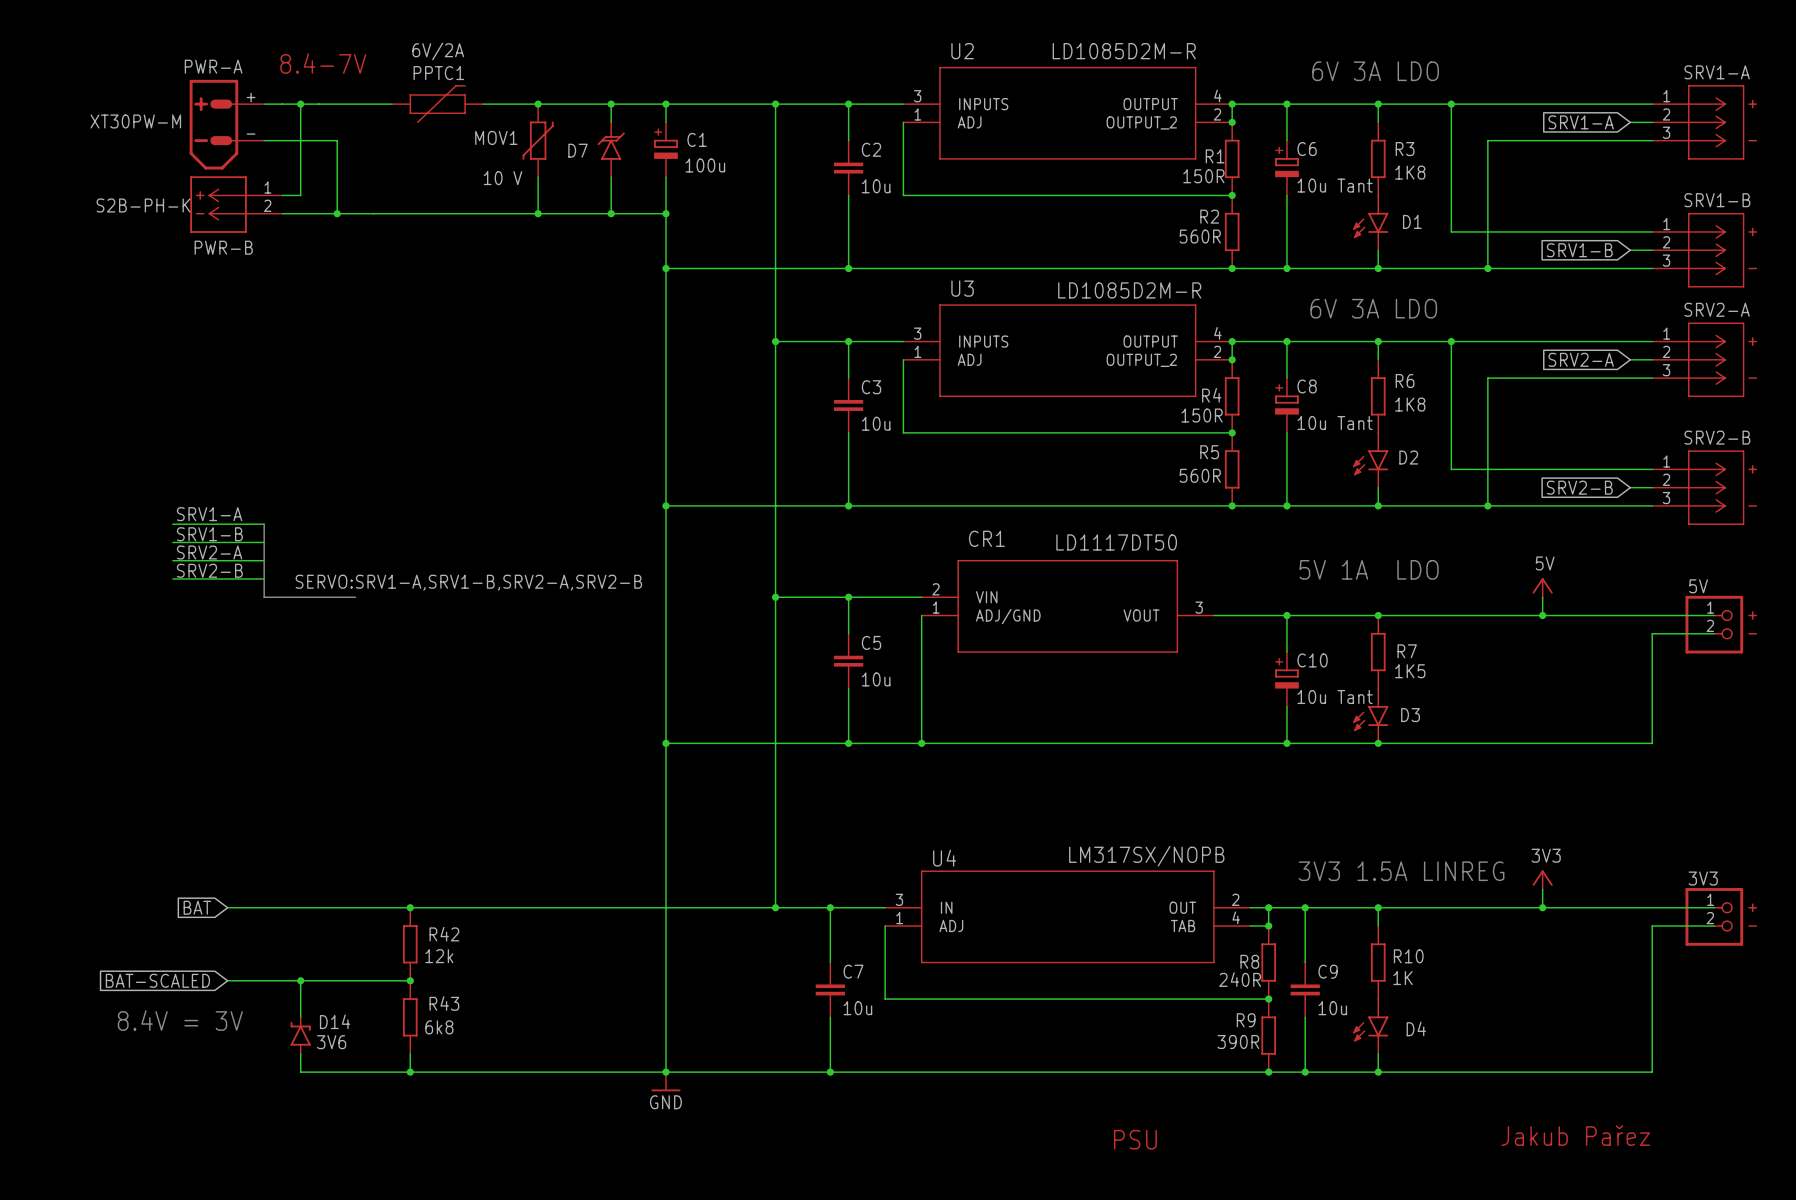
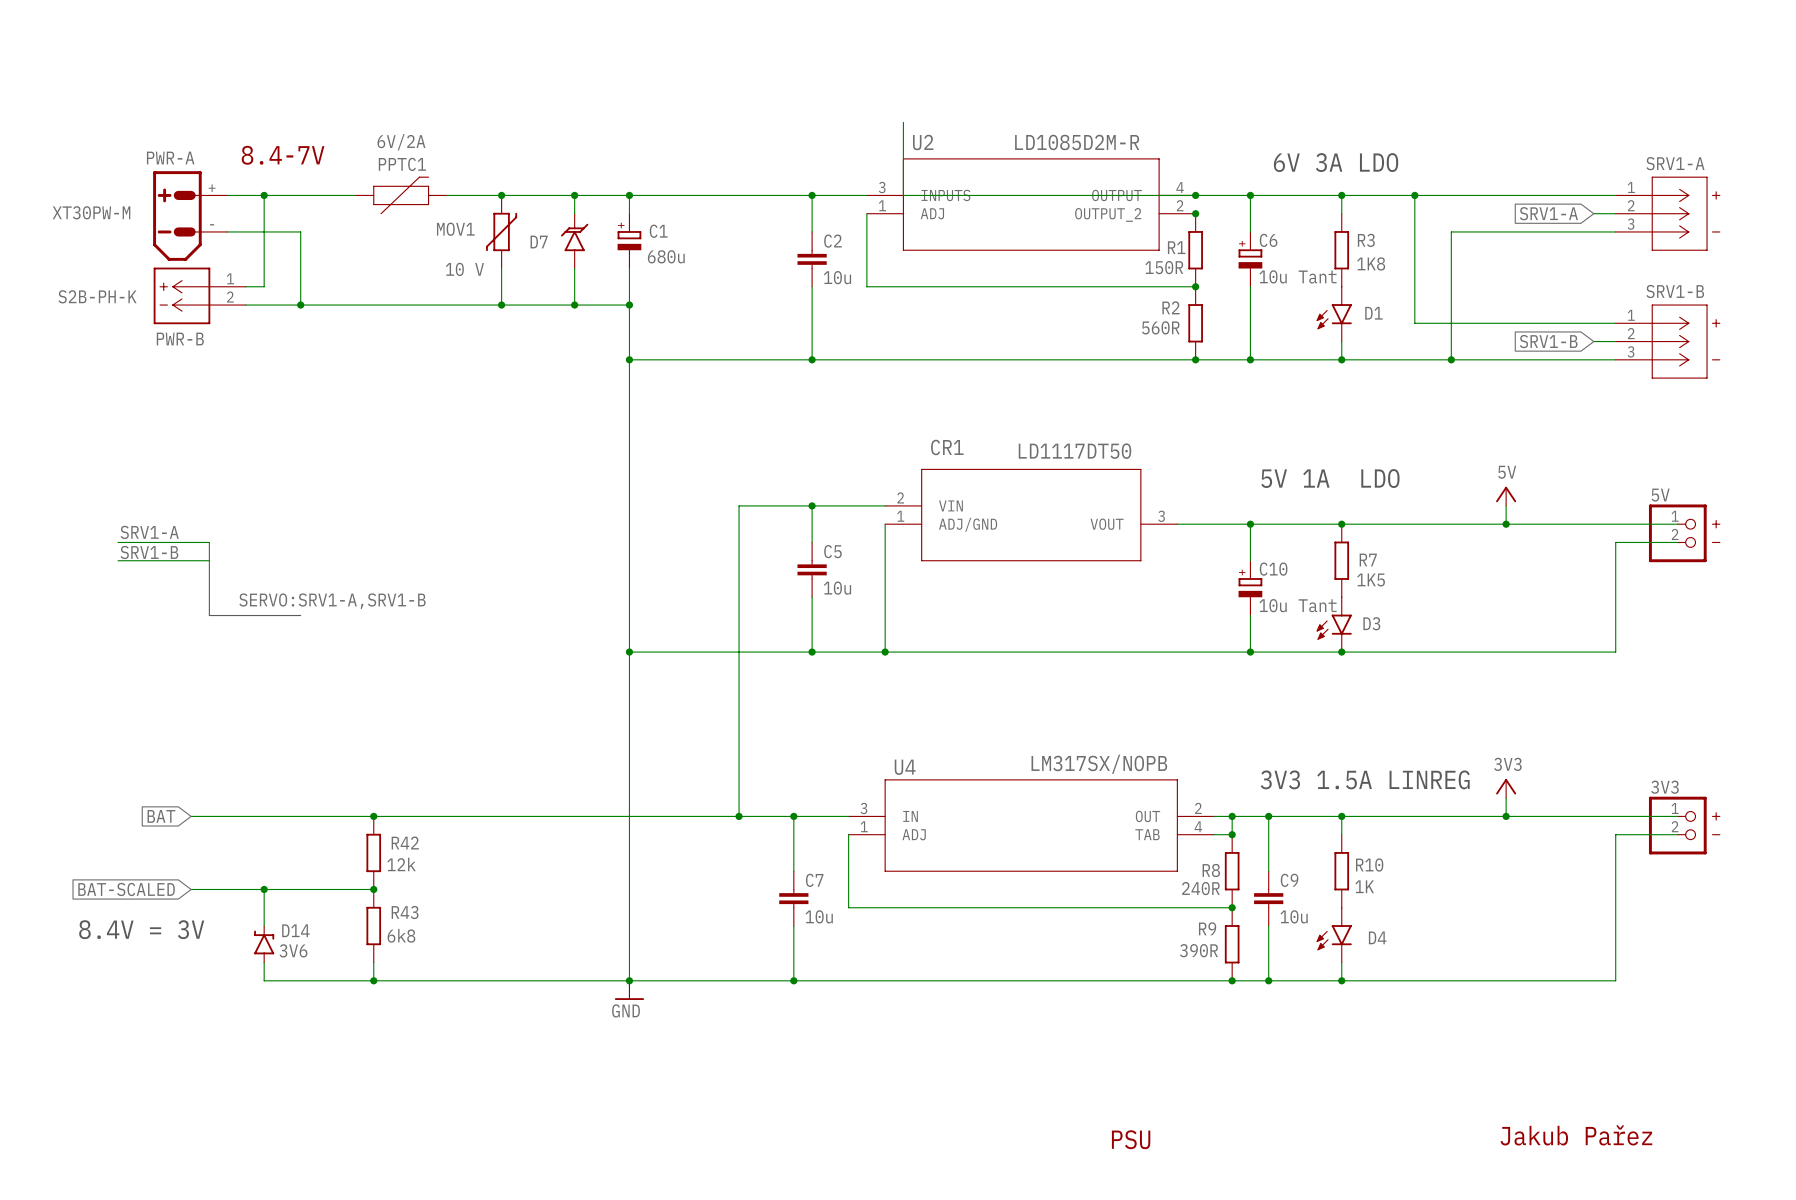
text position: 8.4-7V (323, 63) -> 8.4-7V (283, 155)
text: 6V 3A LDO (1375, 71) -> none
line: (1752, 100) (1752, 107) -> (1716, 191) (1716, 199)
wire: (264, 104) (392, 104) -> none
wire: (300, 104) (300, 195) -> (355, 195) (300, 195)
junction: (300, 104) -> none
PPTC1 position: (437, 104) -> (401, 195)
wire: (483, 104) (903, 104) -> (446, 195) (866, 195)
junction: (538, 104) -> none
wire: (611, 104) (611, 122) -> (574, 195) (574, 213)
junction: (611, 104) -> none
wire: (665, 104) (665, 122) -> (629, 195) (629, 213)
junction: (665, 104) -> none
wire: (775, 104) (775, 907) -> none
junction: (775, 104) -> none
wire: (848, 104) (848, 140) -> (812, 195) (812, 231)
junction: (848, 104) -> none
junction: (1232, 104) -> none
wire: (1286, 104) (1286, 140) -> (1250, 195) (1250, 231)
junction: (1286, 104) -> none
wire: (1378, 104) (1378, 122) -> (1341, 195) (1341, 213)
junction: (1378, 104) -> none
wire: (1451, 104) (1451, 231) -> (1451, 341) (1451, 231)
junction: (1451, 104) -> none
wire: (1652, 104) (1232, 104) (1232, 122) -> none
line: (1749, 104) (1756, 104) -> (1712, 195) (1719, 195)
U2 position: (1067, 113) -> (1031, 204)
junction: (1232, 122) -> none
global label position: SRV1-A (1581, 122) -> SRV1-A (1548, 213)
wire: (1630, 122) (1652, 122) -> (1593, 213) (1615, 213)
SRV1-A position: (1698, 122) -> (1661, 213)
PWR-A position: (226, 124) -> (190, 215)
wire: (264, 140) (337, 140) (337, 213) -> (227, 231) (300, 231) (300, 305)
MOV1 position: (538, 140) -> (501, 231)
wire: (1652, 140) (1487, 140) (1487, 268) -> none
line: (1749, 140) (1756, 140) -> (1712, 231) (1719, 231)
D7 position: (611, 149) -> (574, 241)
C1 position: (665, 149) -> (629, 241)
R1 position: (1232, 158) -> (1195, 250)
R3 position: (1378, 158) -> (1341, 250)
text: none -> 6V 3A LDO (1336, 162)
C1 value: 100u (705, 165) -> 680u (666, 256)
C2 position: (848, 168) -> (812, 259)
C6 position: (1286, 168) -> (1250, 259)
wire: (538, 177) (538, 213) -> (501, 268) (501, 305)
wire: (611, 177) (611, 213) -> (574, 268) (574, 305)
wire: (665, 177) (665, 1072) -> none
wire: none -> (264, 195) (264, 286) (245, 286)
junction: none -> (264, 195)
junction: none -> (501, 195)
junction: none -> (574, 195)
junction: none -> (629, 195)
junction: none -> (812, 195)
wire: (848, 195) (848, 268) -> (812, 286) (812, 359)
junction: none -> (1195, 195)
wire: none -> (1232, 195) (1615, 195)
junction: (1232, 195) -> none
junction: none -> (1250, 195)
wire: (1286, 195) (1286, 268) -> (1250, 286) (1250, 359)
junction: none -> (1341, 195)
wire: none -> (1414, 195) (1414, 323) (1615, 323)
junction: none -> (1414, 195)
PWR-B position: (236, 204) -> (199, 295)
text position: S2B-PH-K (143, 205) -> S2B-PH-K (97, 296)
line: (196, 213) (203, 213) -> (160, 305) (167, 305)
wire: (282, 213) (665, 213) -> (245, 305) (629, 305)
junction: (337, 213) -> none
junction: (538, 213) -> none
junction: (611, 213) -> none
junction: (665, 213) -> none
junction: none -> (1195, 213)
D1 position: (1370, 222) -> (1334, 314)
line: (1752, 228) (1752, 235) -> (1716, 319) (1716, 326)
R2 position: (1232, 231) -> (1195, 323)
line: (1749, 231) (1756, 231) -> (1712, 323) (1719, 323)
wire: (1378, 250) (1378, 268) -> (1341, 341) (1341, 359)
global label position: SRV1-B (1579, 250) -> SRV1-B (1548, 341)
wire: (1630, 250) (1652, 250) -> none
SRV1-B position: (1698, 250) -> (1661, 341)
wire: none -> (629, 268) (629, 980)
wire: (665, 268) (1652, 268) -> (629, 359) (1615, 359)
junction: (665, 268) -> none
junction: (848, 268) -> none
junction: (1232, 268) -> none
junction: (1286, 268) -> none
junction: (1378, 268) -> none
junction: (1487, 268) -> none
line: (1749, 268) (1756, 268) -> (1712, 359) (1719, 359)
junction: none -> (1195, 286)
junction: none -> (300, 305)
junction: none -> (501, 305)
junction: none -> (574, 305)
junction: none -> (629, 305)
text: 6V 3A LDO (1373, 308) -> none
line: (1752, 337) (1752, 345) -> none
wire: (775, 341) (903, 341) -> none
junction: (775, 341) -> none
wire: (848, 341) (848, 378) -> none
junction: (848, 341) -> none
junction: (1232, 341) -> none
wire: (1286, 341) (1286, 378) -> none
junction: (1286, 341) -> none
wire: (1378, 341) (1378, 359) -> none
junction: (1378, 341) -> none
junction position: (1451, 341) -> (1451, 359)
wire: (1593, 341) (1232, 341) (1232, 359) -> none
line: (1749, 341) (1756, 341) -> none
U3: LD1085D2M-R (1067, 350) -> none
junction: none -> (629, 359)
junction: none -> (812, 359)
wire: (903, 359) (903, 432) (1232, 432) -> (866, 213) (866, 286) (1195, 286)
junction: none -> (1195, 359)
junction: (1232, 359) -> none
junction: none -> (1250, 359)
junction: none -> (1341, 359)
wire: (1451, 359) (1451, 469) (1652, 469) -> none
global label: SRV2-A (1581, 359) -> none
SRV2-A: (1698, 359) -> none
wire: (1652, 378) (1487, 378) (1487, 505) -> none
line: (1749, 378) (1756, 378) -> none
R4: 150R (1232, 396) -> none
R6: 1K8 (1378, 396) -> none
C3: 10u (848, 405) -> none
C8: 10u Tant (1286, 405) -> none
wire: (848, 432) (848, 505) -> none
junction: (1232, 432) -> none
wire: (1286, 432) (1286, 505) -> none
D2: (1370, 460) -> none
line: (1752, 465) (1752, 473) -> none
R5: 560R (1232, 469) -> none
line: (1749, 469) (1756, 469) -> none
wire: (1378, 487) (1378, 505) -> none
global label: SRV2-B (1579, 487) -> none
wire: (1630, 487) (1652, 487) -> none
SRV2-B: (1698, 487) -> none
wire: (665, 505) (739, 505) -> (739, 816) (739, 505)
junction: (665, 505) -> none
junction position: (848, 505) -> (812, 505)
wire: (885, 505) (1652, 505) -> none
junction: (1232, 505) -> none
junction: (1286, 505) -> none
junction: (1378, 505) -> none
junction position: (1487, 505) -> (1506, 524)
line: (1749, 505) (1756, 505) -> none
label position: SRV1-A (209, 514) -> SRV1-A (149, 532)
wire: (172, 524) (264, 524) -> none
bus: (264, 524) (264, 597) (355, 597) -> (209, 542) (209, 615) (300, 615)
junction: none -> (1250, 524)
junction: none -> (1341, 524)
label position: SRV1-B (209, 534) -> SRV1-B (149, 552)
wire: (209, 542) (264, 542) -> (118, 542) (172, 542)
label: SRV2-A (209, 552) -> none
wire: (209, 560) (264, 560) -> (118, 560) (172, 560)
text position: 5V 1A LDO (1369, 569) -> 5V 1A LDO (1330, 478)
label: SRV2-B (209, 570) -> none
wire: (172, 578) (264, 578) -> none
label: SERVO:SRV1-A,SRV1-B,SRV2-A,SRV2-B (468, 582) -> SERVO:SRV1-A,SRV1-B (332, 601)
power symbol position: 5V (1542, 587) -> 5V (1506, 496)
wire: (775, 597) (921, 597) -> none
junction: (775, 597) -> none
wire: (848, 597) (848, 633) -> (812, 505) (812, 542)
junction: (848, 597) -> none
wire: (1542, 597) (1542, 615) -> (1506, 505) (1506, 524)
CR1 position: (1067, 606) -> (1031, 515)
line: (1752, 611) (1752, 619) -> (1716, 520) (1716, 527)
wire: (921, 615) (921, 743) -> (885, 524) (885, 652)
wire: (1213, 615) (1714, 615) -> (1177, 524) (1677, 524)
wire: (1286, 615) (1286, 652) -> (1250, 524) (1250, 560)
junction: (1286, 615) -> none
junction: (1378, 615) -> none
junction: (1542, 615) -> none
line: (1749, 615) (1756, 615) -> (1712, 524) (1719, 524)
5V position: (1714, 624) -> (1677, 533)
wire: (1714, 633) (1652, 633) (1652, 743) (665, 743) -> (1677, 542) (1615, 542) (1615, 652) (629, 652)
line: (1749, 633) (1756, 633) -> (1712, 542) (1719, 542)
junction: none -> (629, 652)
junction: none -> (812, 652)
junction: none -> (885, 652)
junction: none -> (1250, 652)
junction: none -> (1341, 652)
R7 position: (1378, 652) -> (1341, 560)
C5 position: (848, 661) -> (812, 569)
C10 position: (1286, 679) -> (1250, 588)
wire: (848, 688) (848, 743) -> (812, 597) (812, 652)
wire: (1286, 706) (1286, 743) -> (1250, 615) (1250, 652)
D3 position: (1370, 715) -> (1334, 624)
junction: (665, 743) -> none
junction: (848, 743) -> none
junction: (921, 743) -> none
junction: (1286, 743) -> none
junction: (1378, 743) -> none
wire: none -> (191, 816) (848, 816)
junction: none -> (373, 816)
junction: none -> (739, 816)
junction: none -> (793, 816)
junction: none -> (1232, 816)
junction: none -> (1268, 816)
junction: none -> (1341, 816)
junction: none -> (1506, 816)
junction: none -> (1232, 834)
wire: none -> (1677, 834) (1615, 834) (1615, 980) (410, 980)
text position: 3V3 1.5A LINREG (1401, 871) -> 3V3 1.5A LINREG (1365, 779)
power symbol position: 3V3 (1542, 879) -> 3V3 (1506, 788)
wire: none -> (191, 889) (373, 889)
junction: none -> (264, 889)
junction: none -> (373, 889)
wire: (1542, 889) (1542, 907) -> (1506, 798) (1506, 816)
line: (1752, 904) (1752, 911) -> (1716, 812) (1716, 820)
global label position: BAT (197, 907) -> BAT (161, 816)
wire: (227, 907) (848, 907) -> (848, 834) (848, 907)
junction: (410, 907) -> none
junction: (775, 907) -> none
wire: (830, 907) (830, 962) -> (793, 816) (793, 871)
junction: (830, 907) -> none
wire: none -> (885, 907) (1232, 907)
junction: none -> (1232, 907)
wire: (1250, 907) (1714, 907) -> (1213, 816) (1677, 816)
wire: (1268, 907) (1268, 926) (1250, 926) -> (1232, 816) (1232, 834) (1213, 834)
junction: (1268, 907) -> none
wire: (1305, 907) (1305, 962) -> (1268, 816) (1268, 871)
junction: (1305, 907) -> none
wire: (1378, 907) (1378, 926) -> (1341, 816) (1341, 834)
junction: (1378, 907) -> none
junction: (1542, 907) -> none
line: (1749, 907) (1756, 907) -> (1712, 816) (1719, 816)
U4 position: (1067, 916) -> (1031, 825)
3V3 position: (1714, 916) -> (1677, 825)
wire: (885, 926) (885, 999) (1268, 999) -> none
junction: (1268, 926) -> none
wire: (1714, 926) (1652, 926) (1652, 1072) (300, 1072) (300, 1053) -> none
line: (1749, 926) (1756, 926) -> (1712, 834) (1719, 834)
R42 position: (410, 944) -> (373, 852)
R8 position: (1268, 962) -> (1232, 871)
R10 position: (1378, 962) -> (1341, 871)
global label position: BAT-SCALED (157, 980) -> BAT-SCALED (126, 889)
wire: (227, 980) (264, 980) -> (264, 962) (264, 980)
wire: (300, 980) (300, 1017) -> (264, 889) (264, 926)
junction: (300, 980) -> none
junction: none -> (373, 980)
junction: (410, 980) -> none
junction: none -> (629, 980)
junction: none -> (793, 980)
junction: none -> (1232, 980)
junction: none -> (1341, 980)
C7 position: (830, 989) -> (793, 898)
C9 position: (1305, 989) -> (1268, 898)
junction position: (1268, 999) -> (1268, 980)
R43 position: (410, 1017) -> (373, 926)
wire: (830, 1017) (830, 1072) -> (793, 926) (793, 980)
wire: (1305, 1017) (1305, 1072) -> (1268, 926) (1268, 980)
text position: 8.4V = 3V (180, 1020) -> 8.4V = 3V (141, 929)
D4 position: (1370, 1026) -> (1334, 935)
D14 position: (300, 1035) -> (264, 944)
R9 position: (1268, 1035) -> (1232, 944)
wire: (410, 1053) (410, 1072) -> (373, 962) (373, 980)
wire: (1378, 1053) (1378, 1072) -> (1341, 962) (1341, 980)
junction: (410, 1072) -> none
junction: (665, 1072) -> none
junction: (830, 1072) -> none
junction: (1268, 1072) -> none
junction: (1305, 1072) -> none
junction: (1378, 1072) -> none
power symbol position: GND (665, 1081) -> GND (629, 990)

